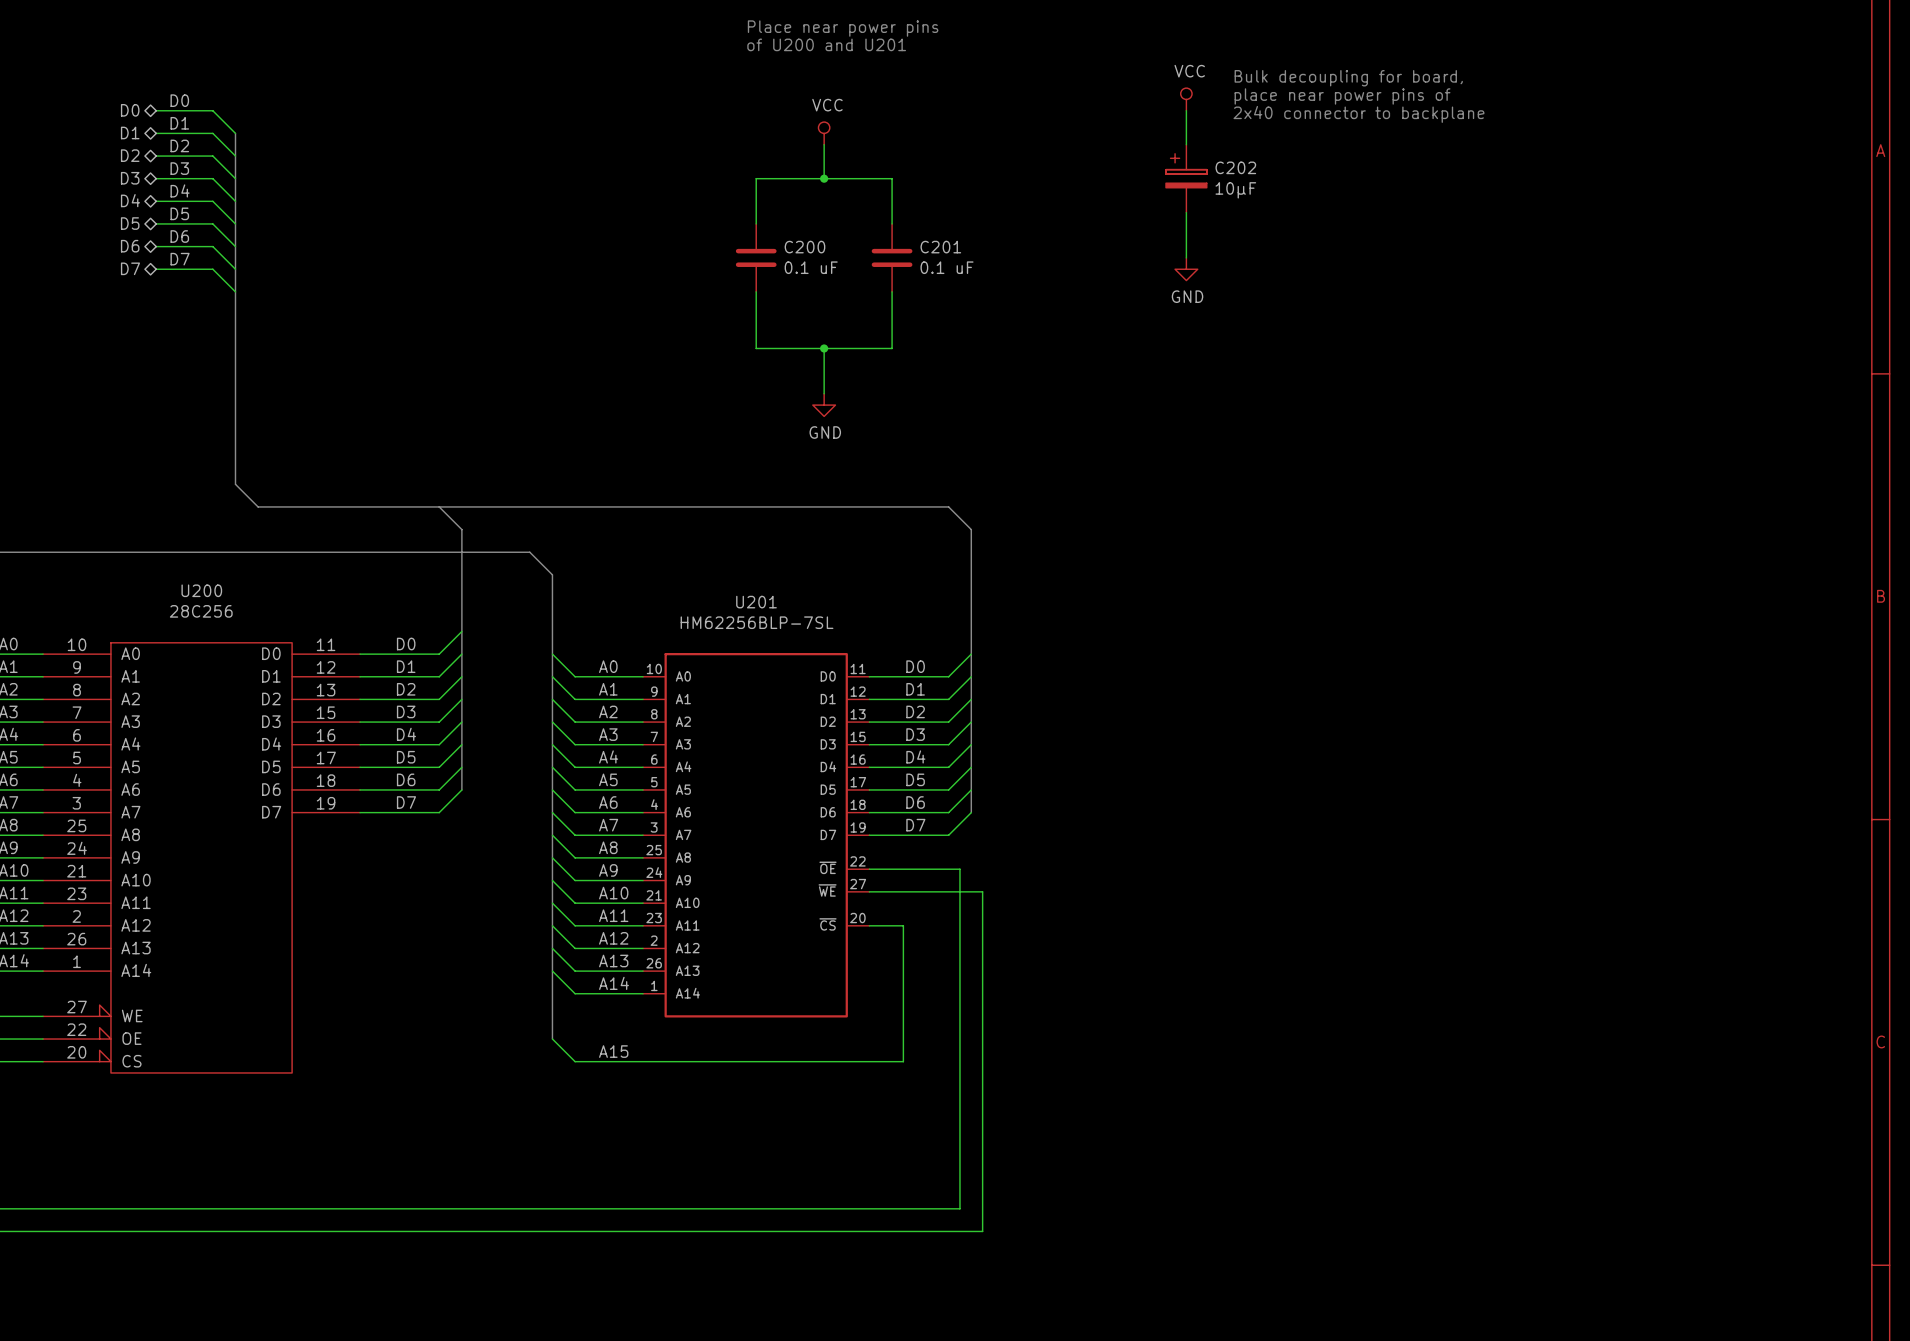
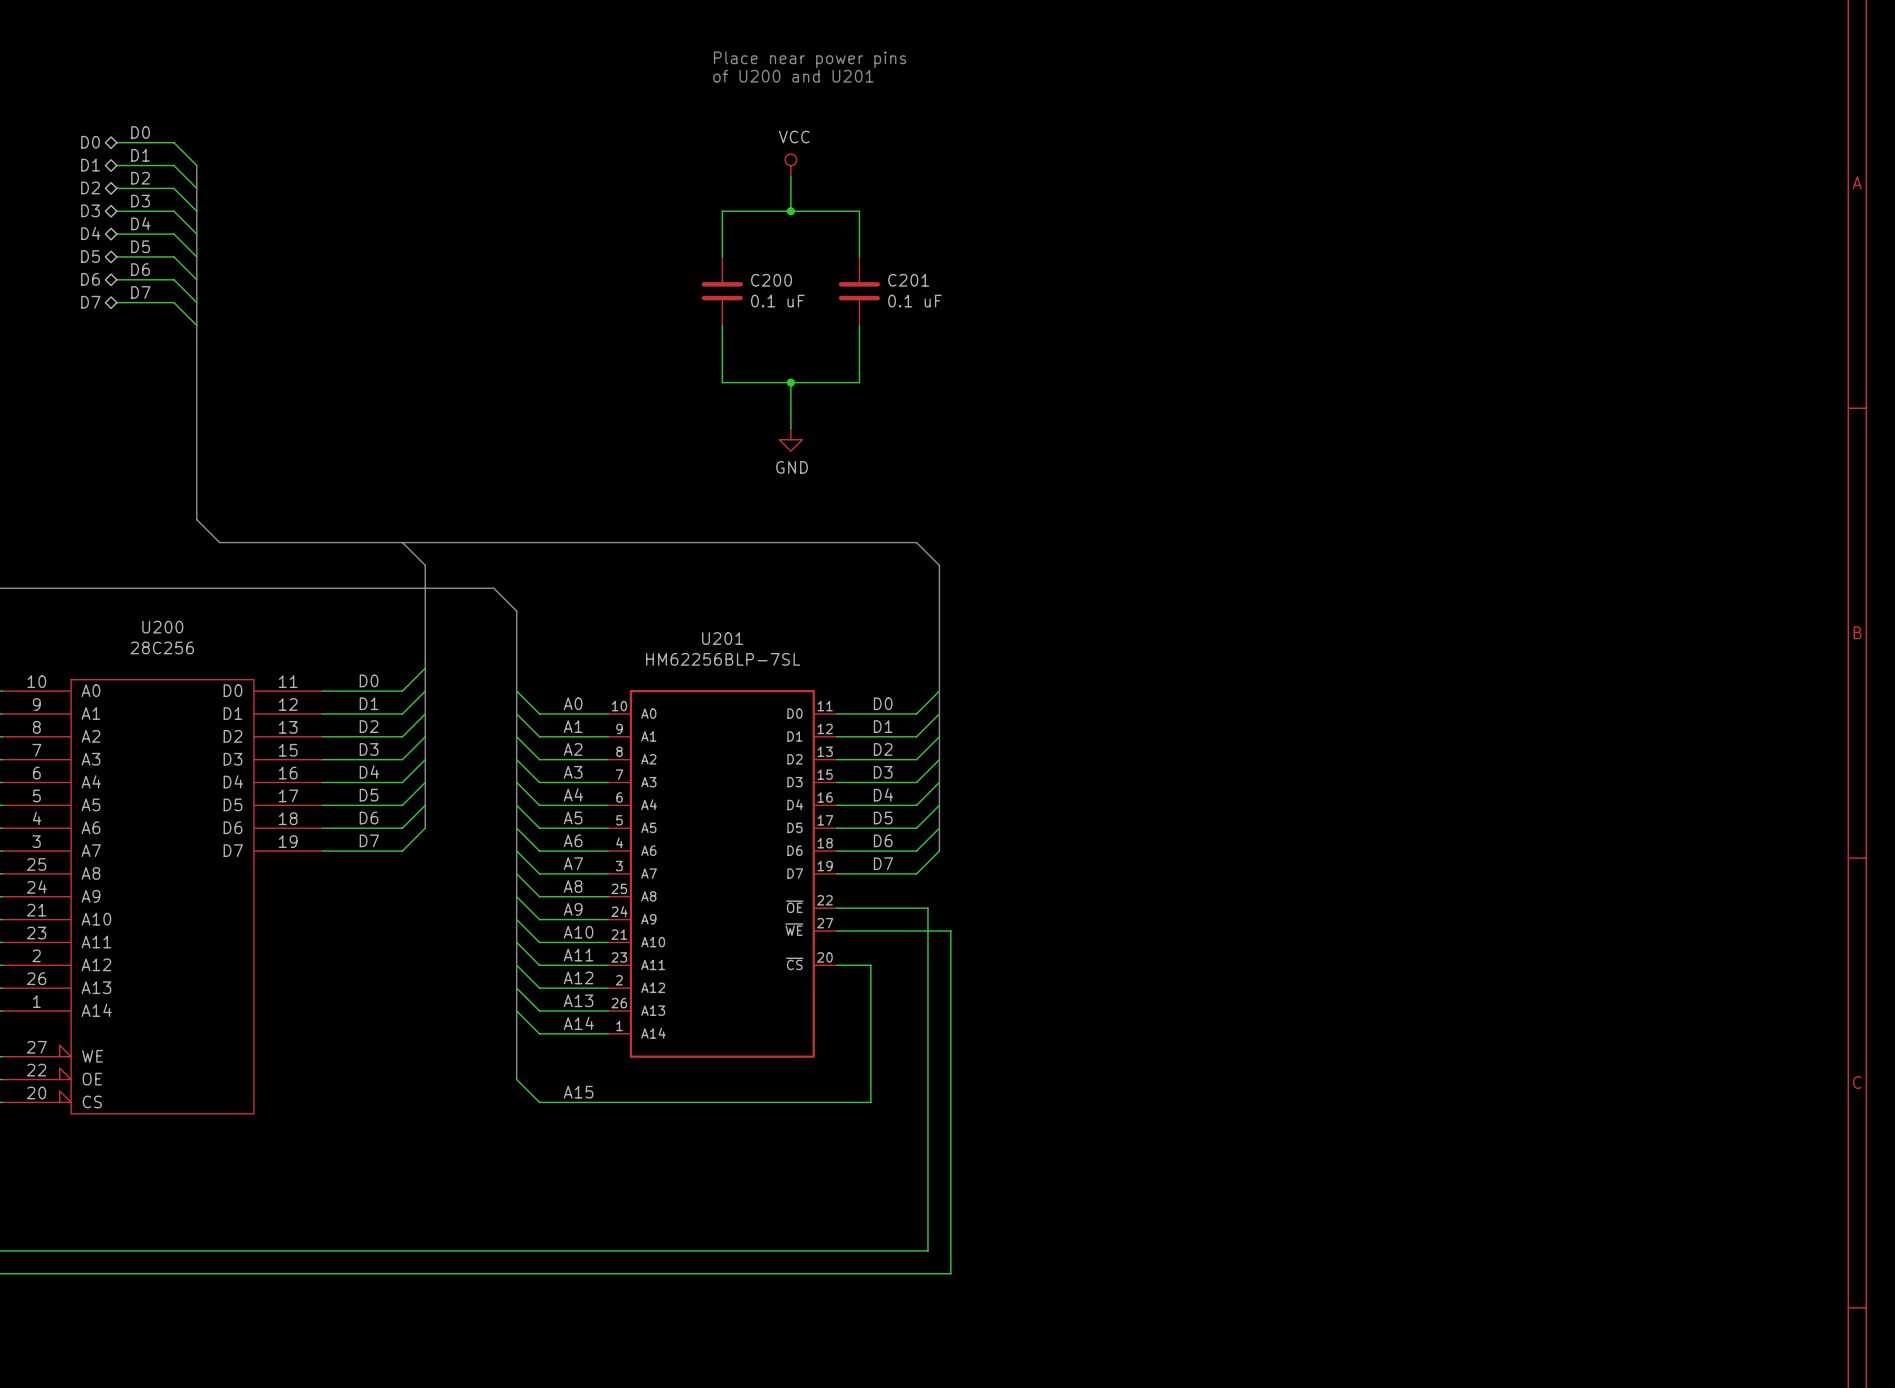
text: Bulk decoupling for board, (1348, 78) -> none
text: place near power pins of (1342, 96) -> none
power symbol: VCC (1186, 99) -> none
wire: (1186, 110) (1186, 144) -> none
text: 2x40 connector to backplane (1358, 114) -> none
C202: 10μF (1186, 178) -> none
wire: (1186, 212) (1186, 257) -> none
power symbol: GND (1186, 269) -> none

